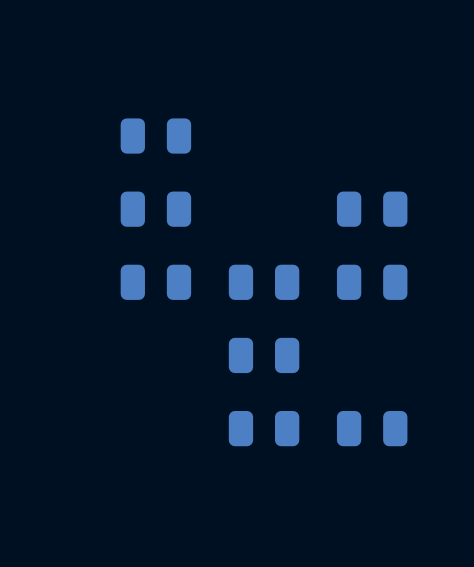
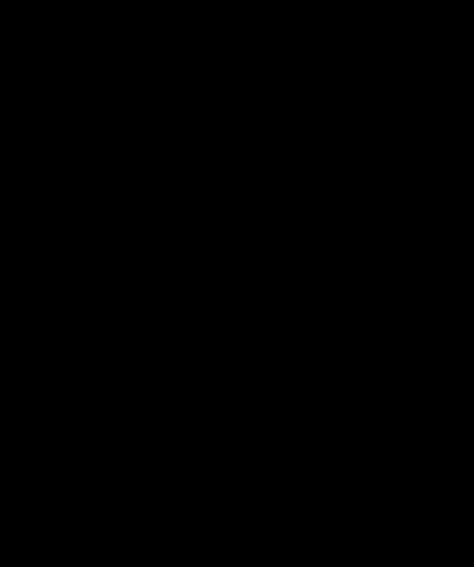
part: (155, 136) -> none
part: (155, 209) -> none
part: (372, 209) -> none
part: (155, 282) -> none
part: (264, 282) -> none
part: (372, 282) -> none
part: (264, 355) -> none
part: (264, 428) -> none
part: (372, 428) -> none

